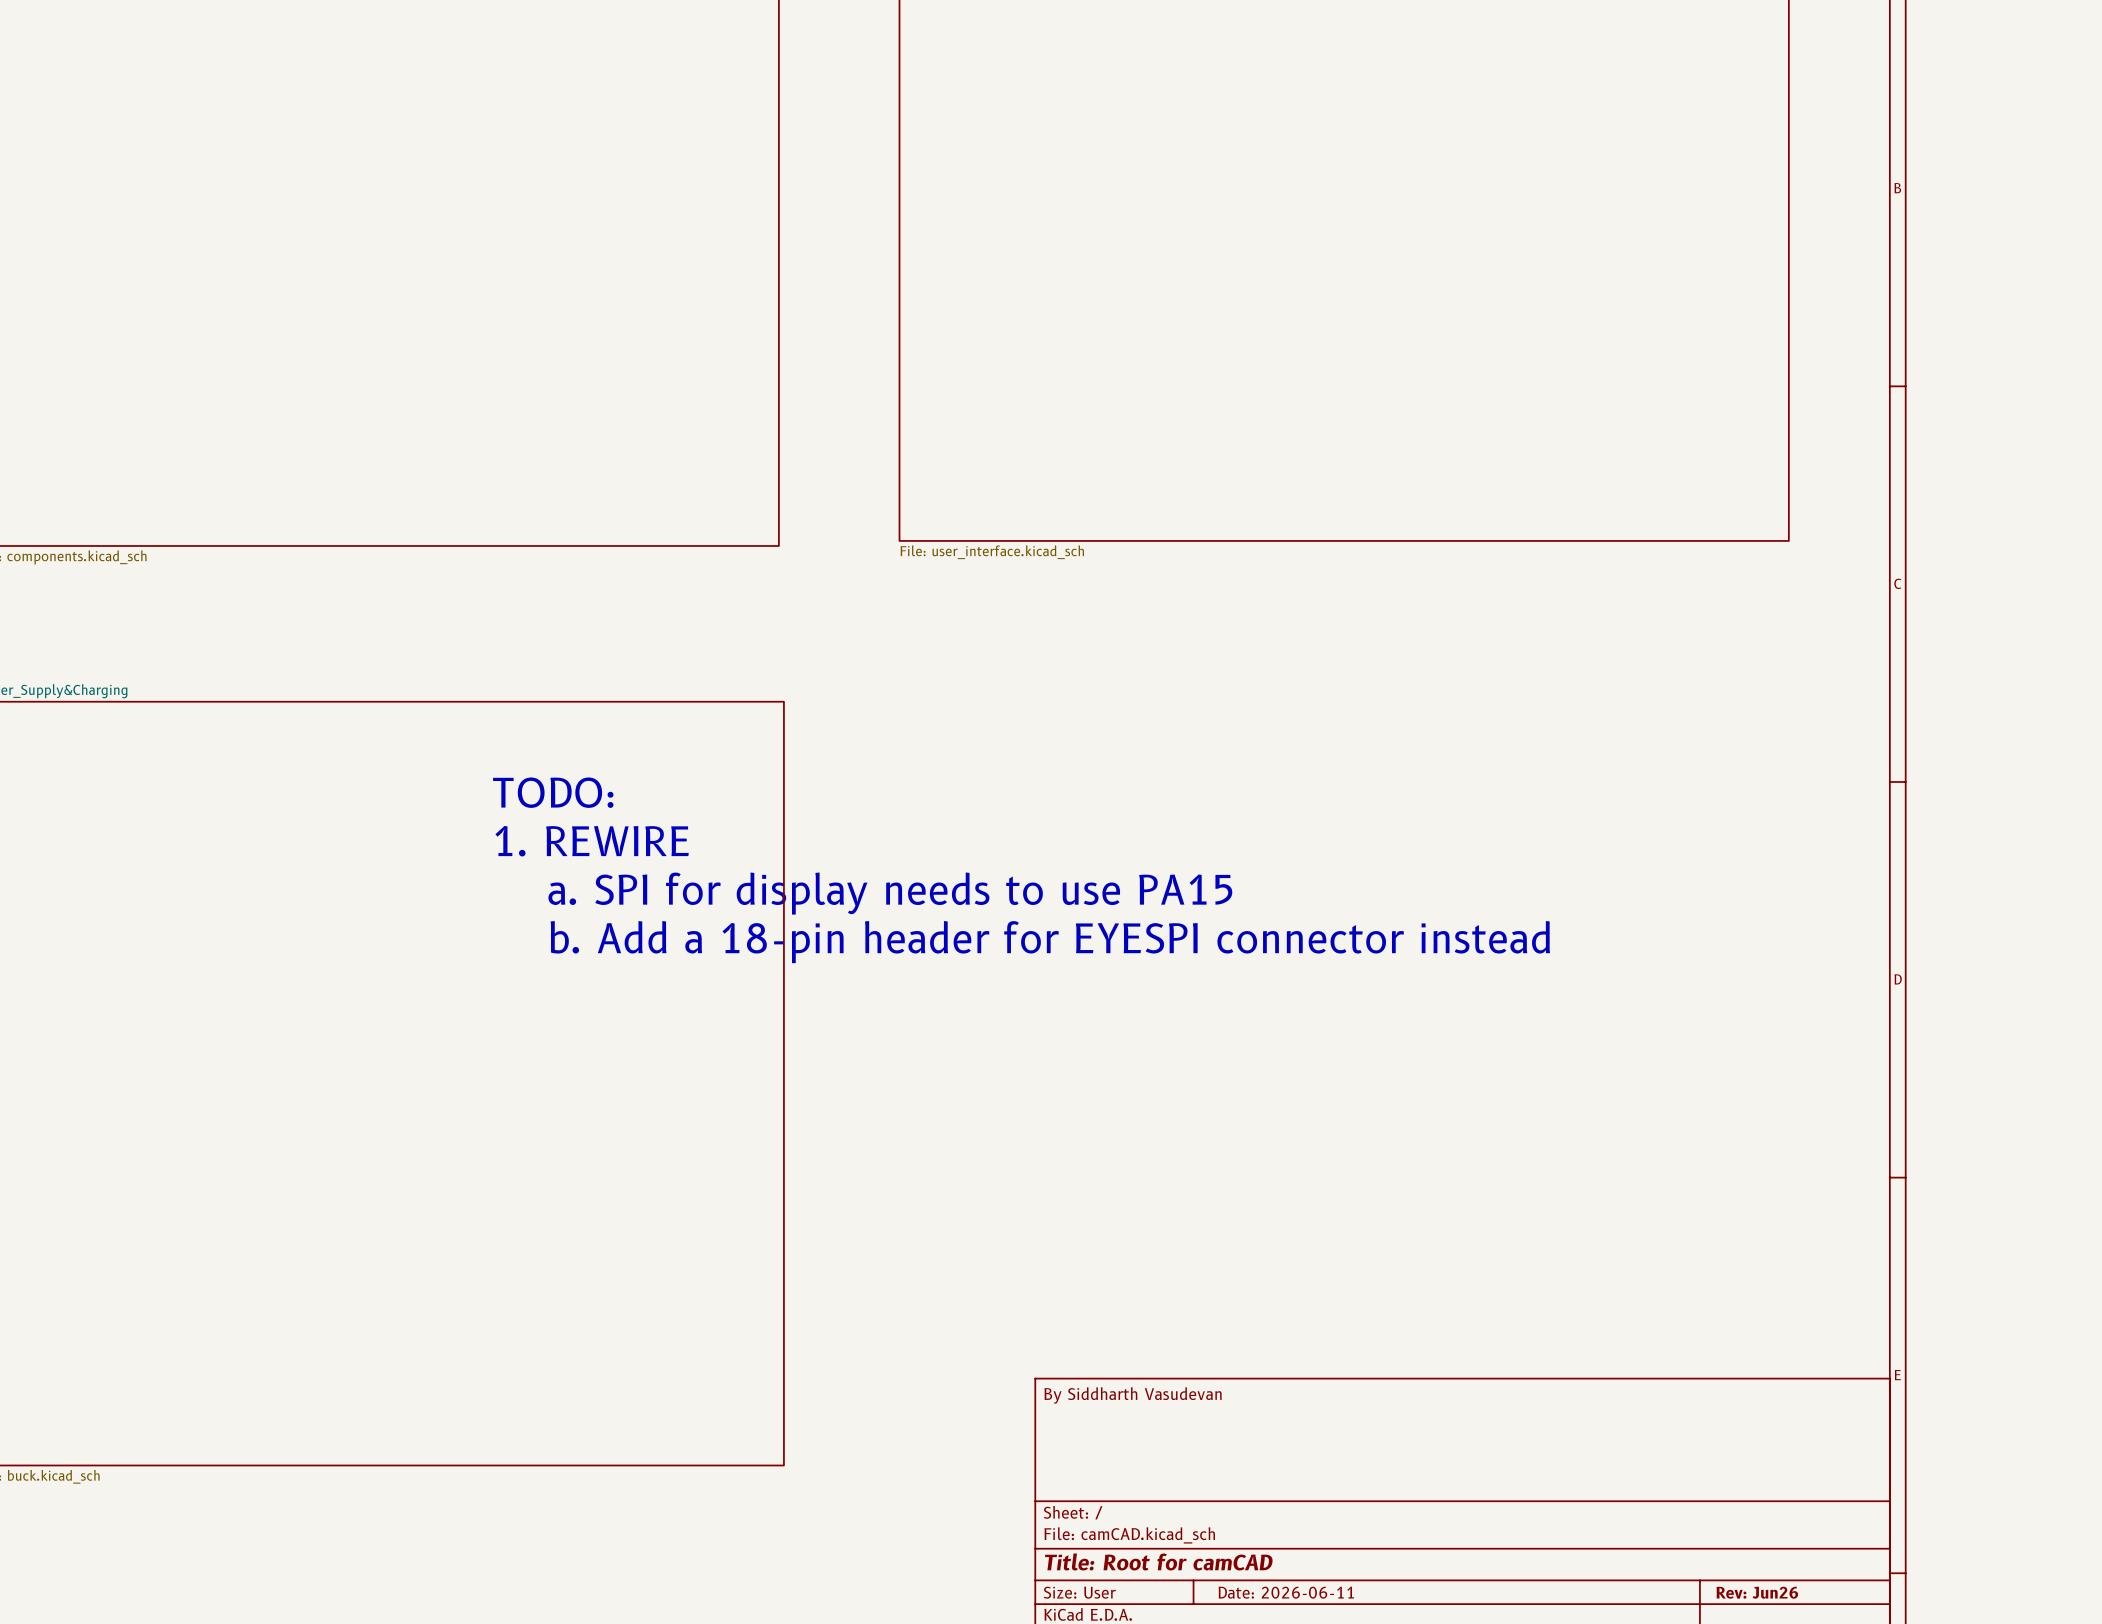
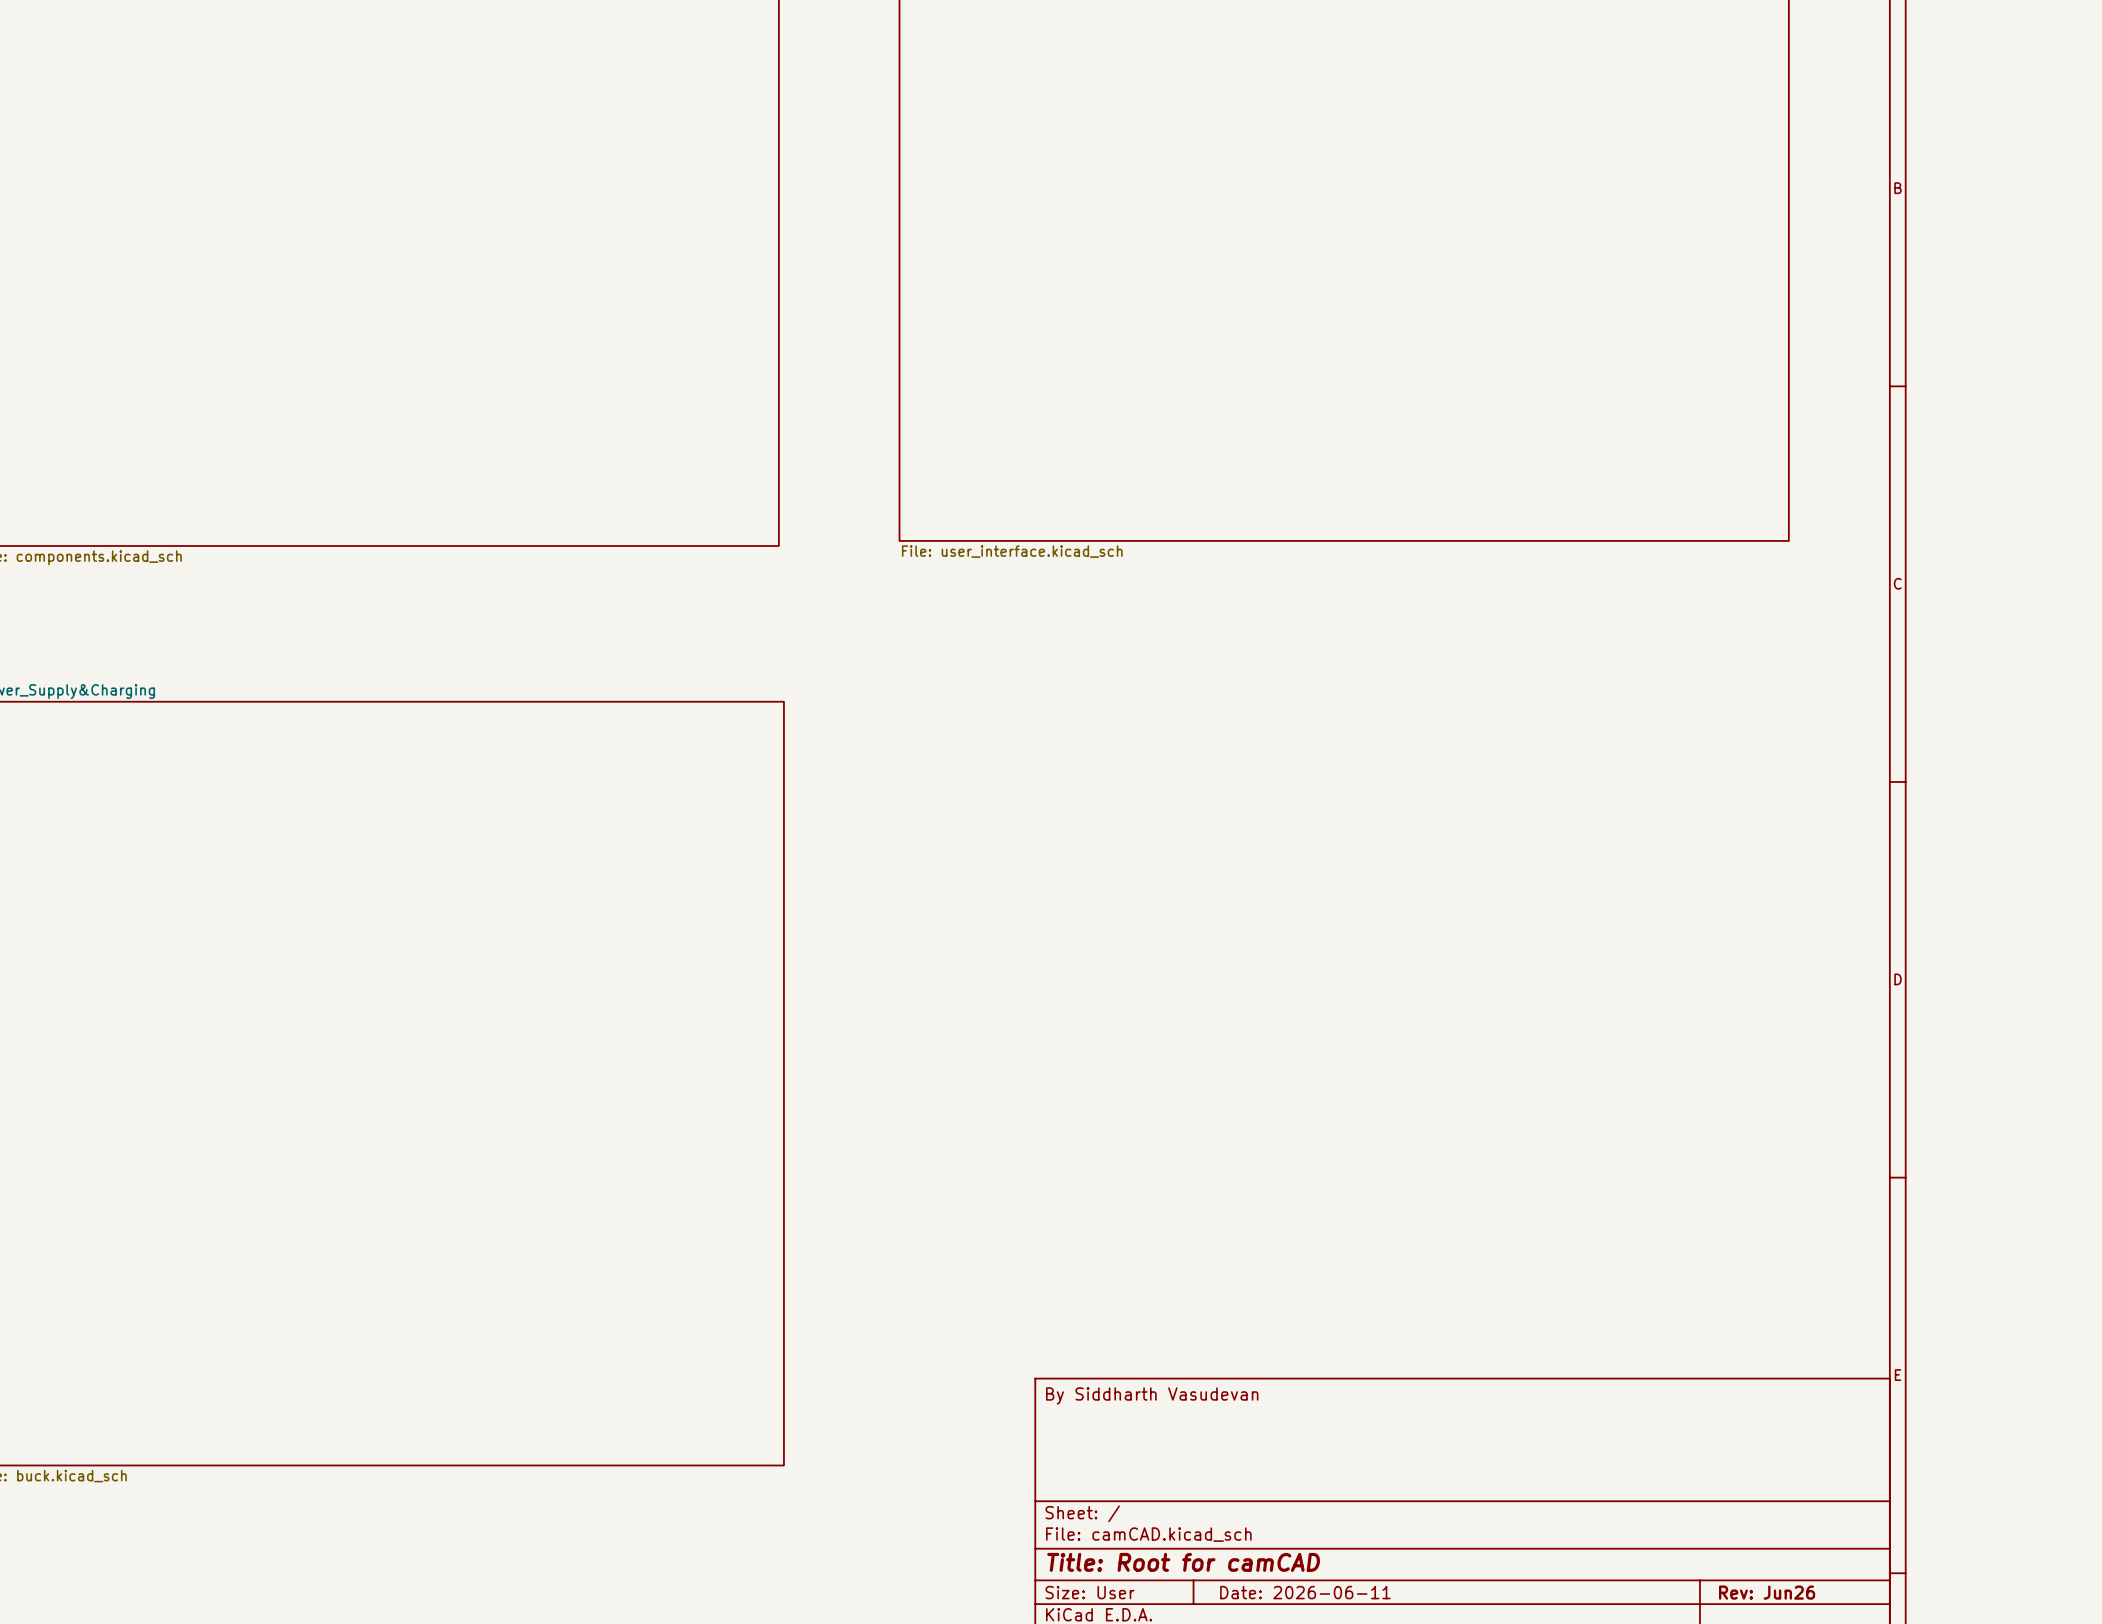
text: TODO: (553, 792) -> none
text: 1. REWIRE (592, 841) -> none
text: a. SPI for display needs to use PA15 (890, 893) -> none
text: b. Add a 18-pin header for EYESPI connector instead (1050, 942) -> none

